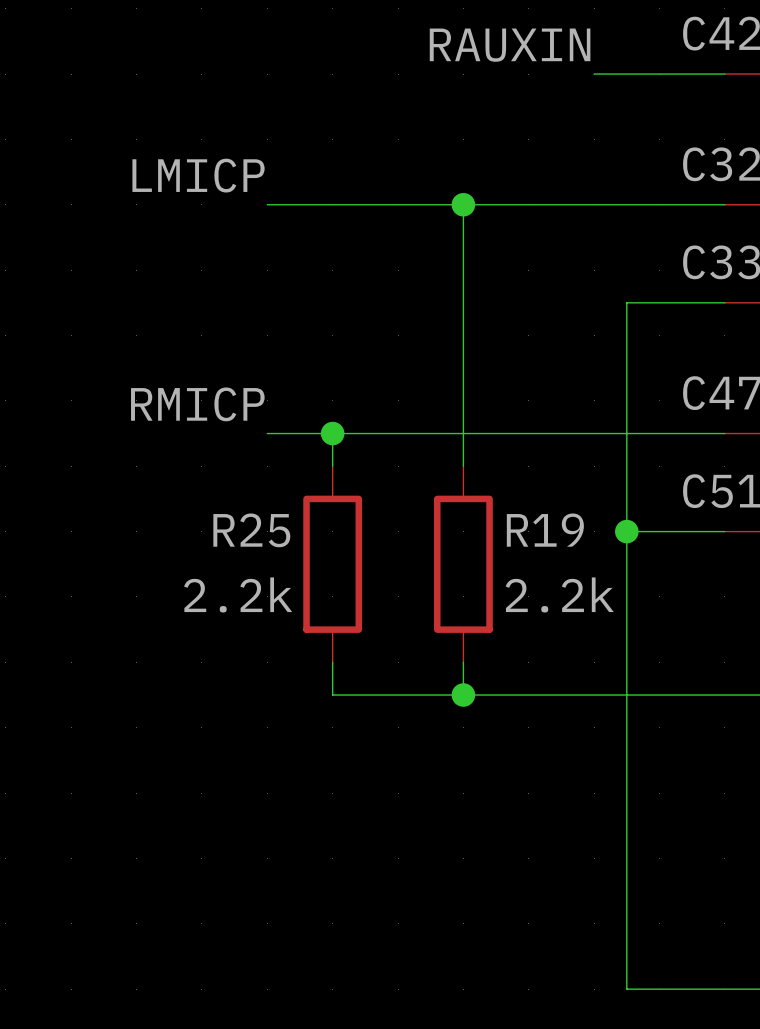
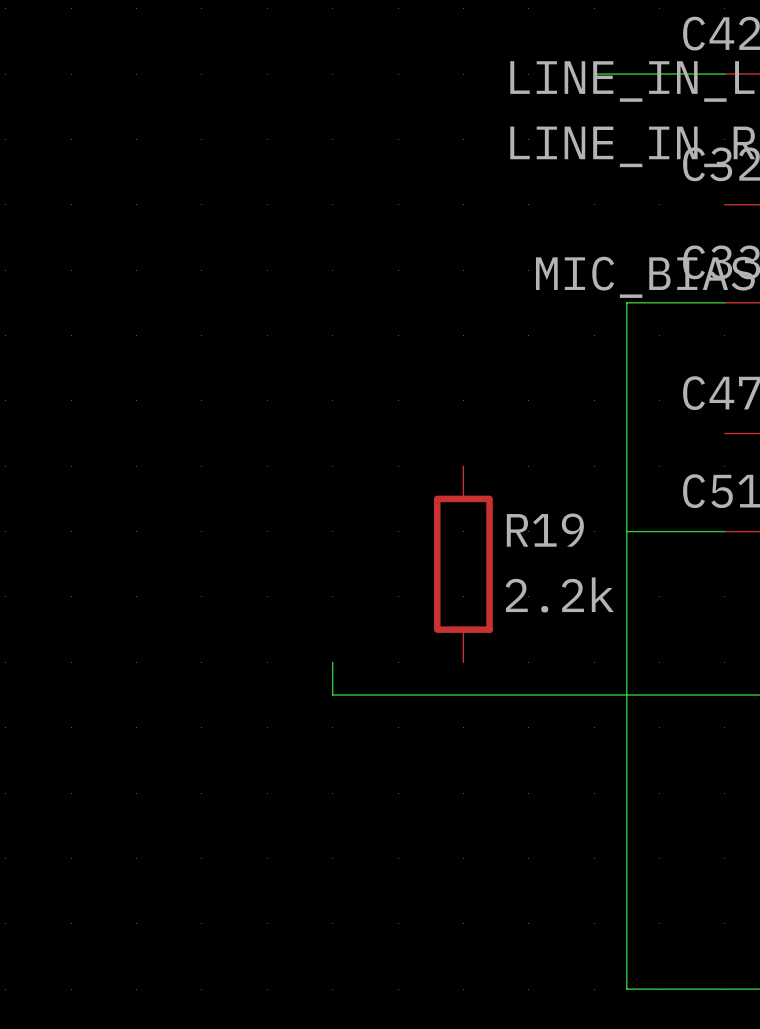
label: RAUXIN (510, 45) -> none
label: none -> LINE_IN_L (632, 81)
label: none -> LINE_IN_R (632, 146)
label: LMICP (198, 175) -> none
wire: (267, 204) (724, 204) -> none
wire: (463, 204) (463, 466) -> none
junction: (463, 204) -> none
label: none -> MIC_BIAS (645, 277)
label: RMICP (197, 404) -> none
wire: (267, 433) (724, 433) -> none
wire: (332, 433) (332, 466) -> none
junction: (332, 433) -> none
junction: (626, 531) -> none
R25: 2.2k (332, 564) -> none
wire: (463, 662) (463, 695) -> none
junction: (463, 695) -> none

